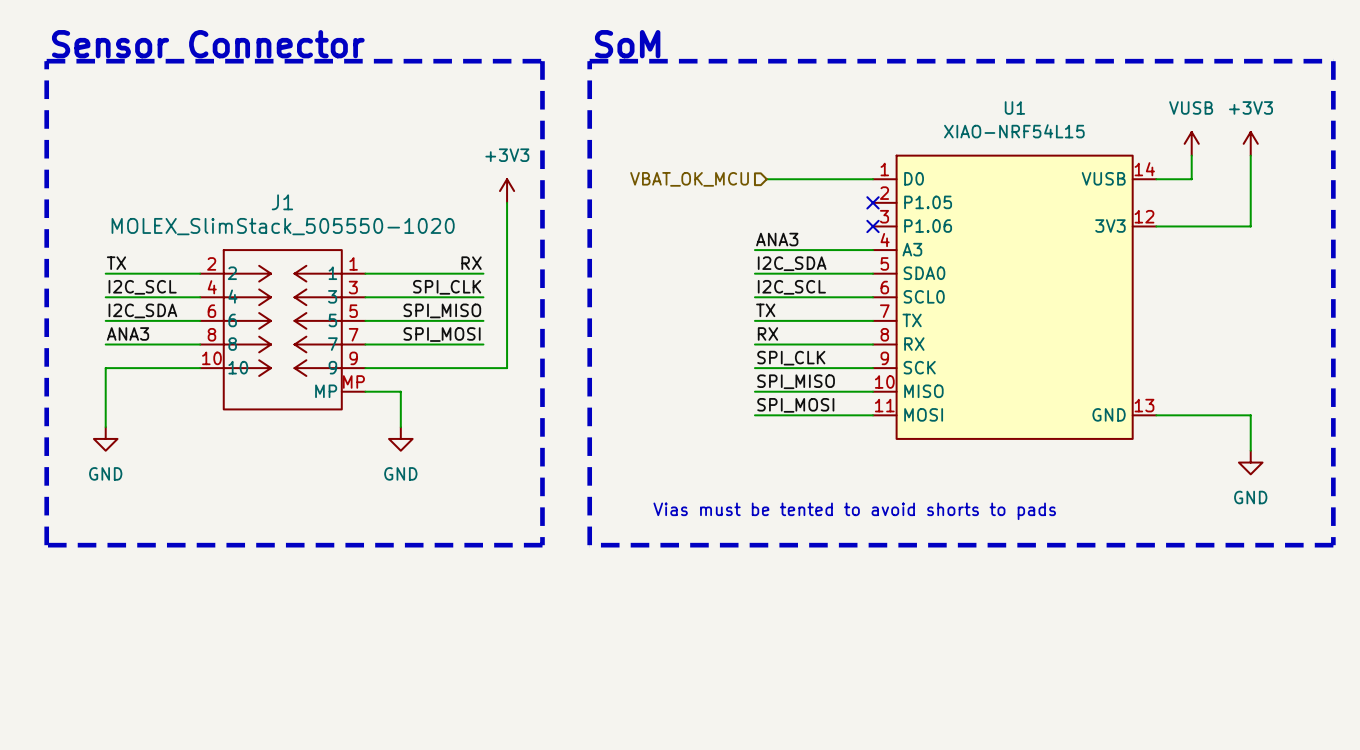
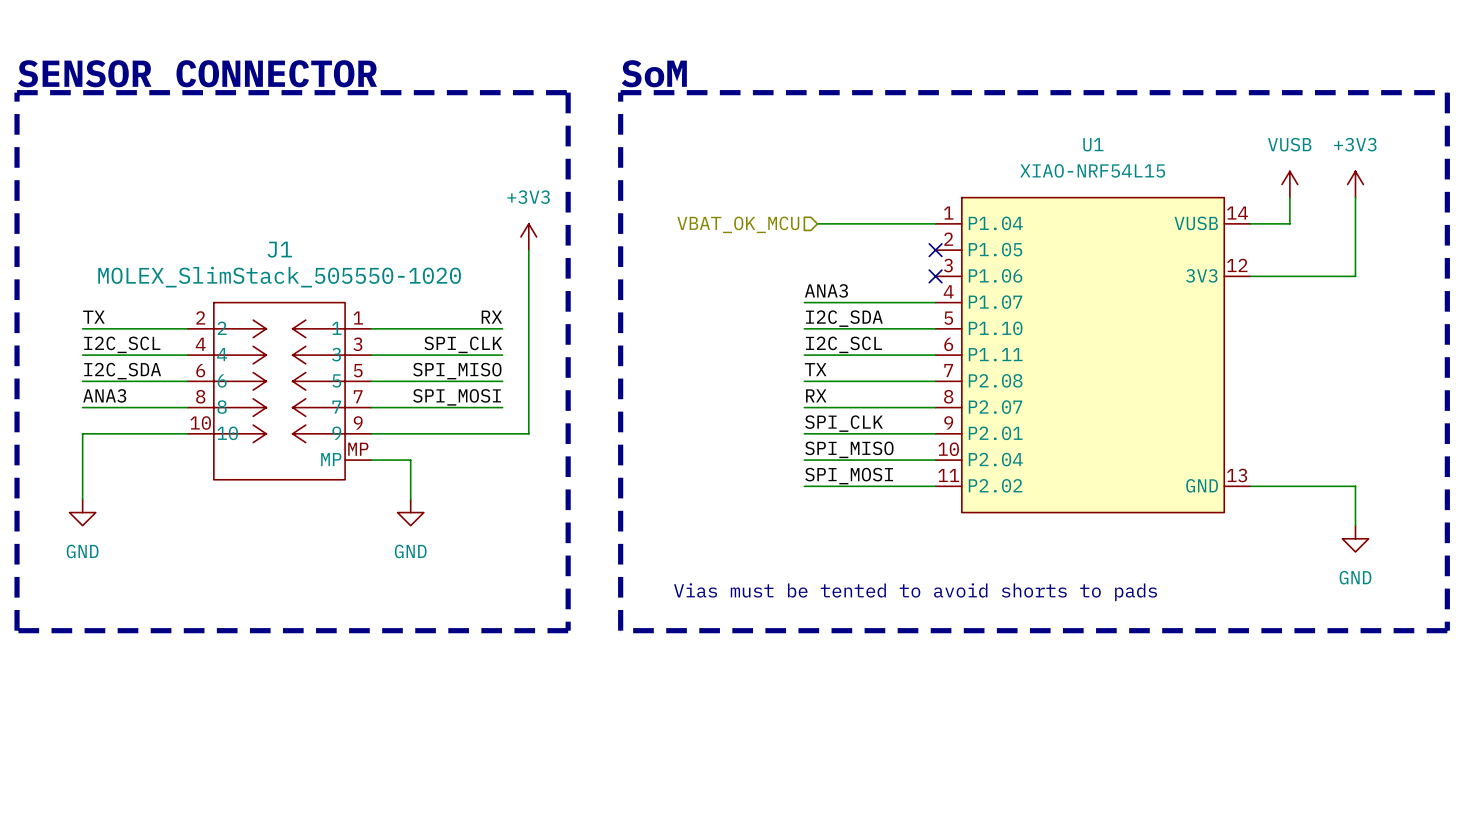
text: Sensor Connector (208, 44) -> SENSOR CONNECTOR (197, 73)
U1 symbol: [873, 155, 1157, 439] -> [935, 197, 1251, 513]

